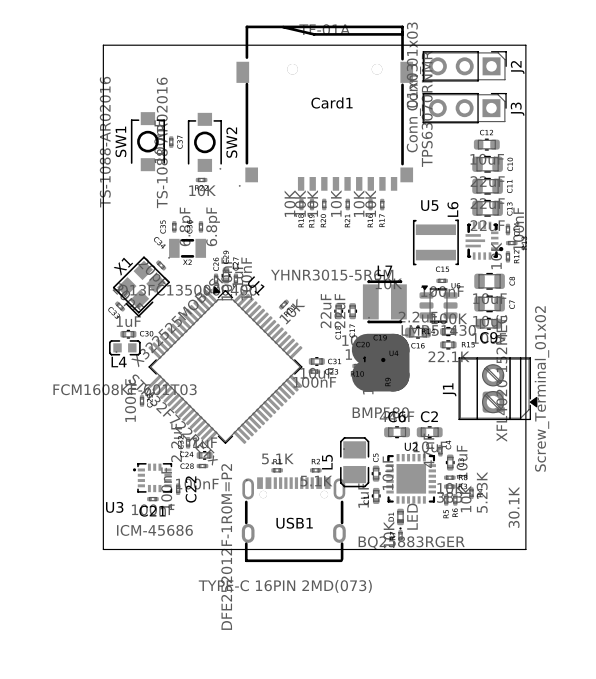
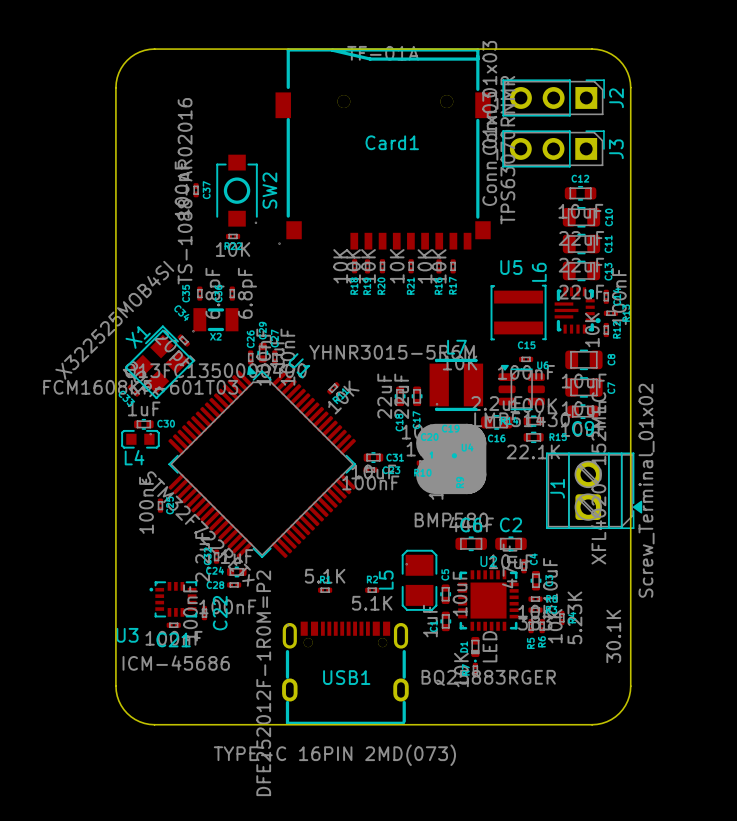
board edge: (103, 45) (525, 45) (525, 549) (103, 549) (103, 45) -> (154, 49) (139, 52) (127, 60) (118, 72) (115, 87) (115, 686) (118, 700) (123, 709) (139, 721) (154, 724) (592, 724) (602, 723) (615, 716) (627, 700) (630, 686) (630, 87) (629, 77) (622, 64) (606, 52) (592, 49) (154, 49)
SW1: TS-1088-AR02016 (147, 141) -> none
X1 rotation: 0° (141, 286) -> 180° (159, 362)
L4 rotation: 0° (124, 347) -> 180° (140, 439)
J1 name position: J1 (449, 389) -> J1 (557, 488)
USB1 position: (293, 519) -> (345, 673)

